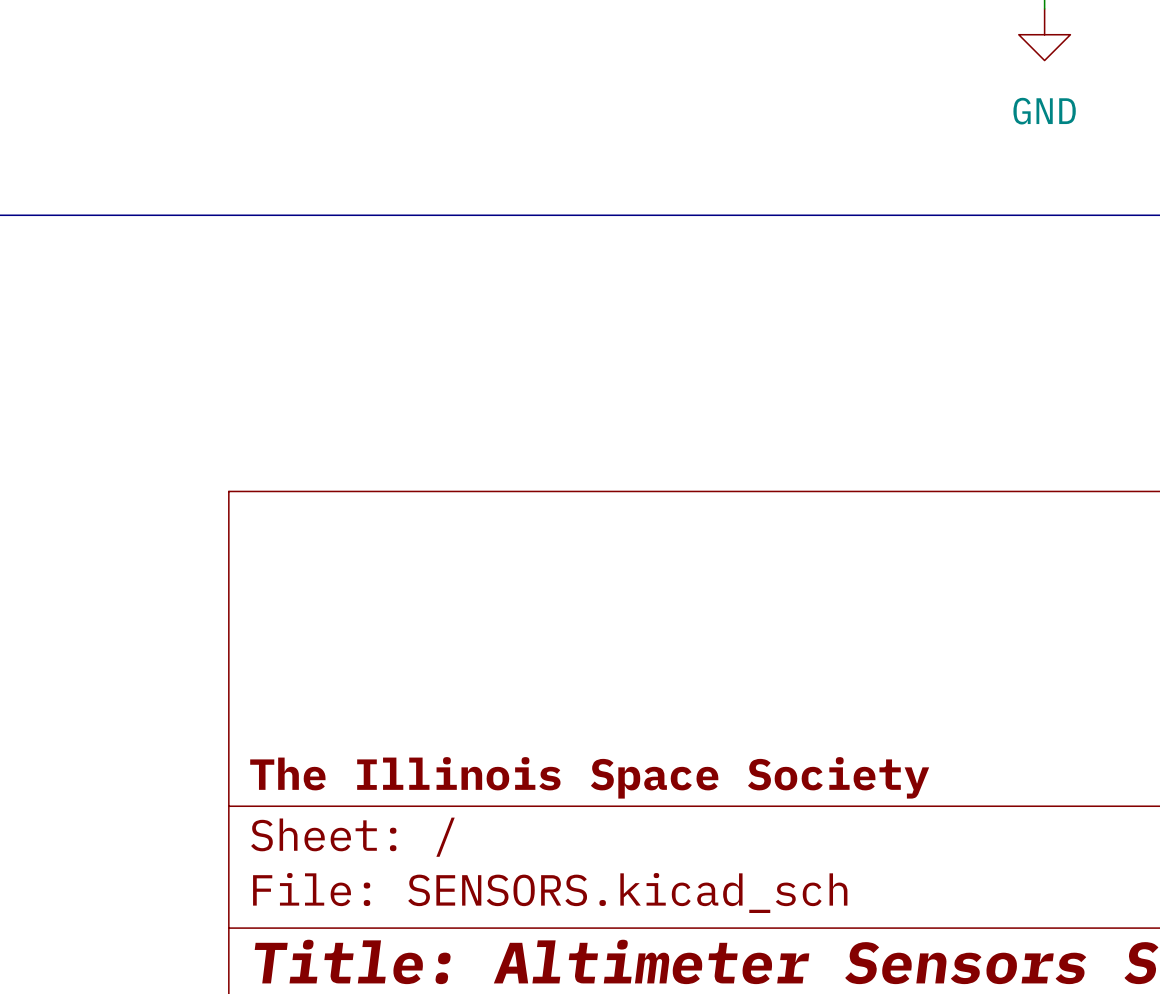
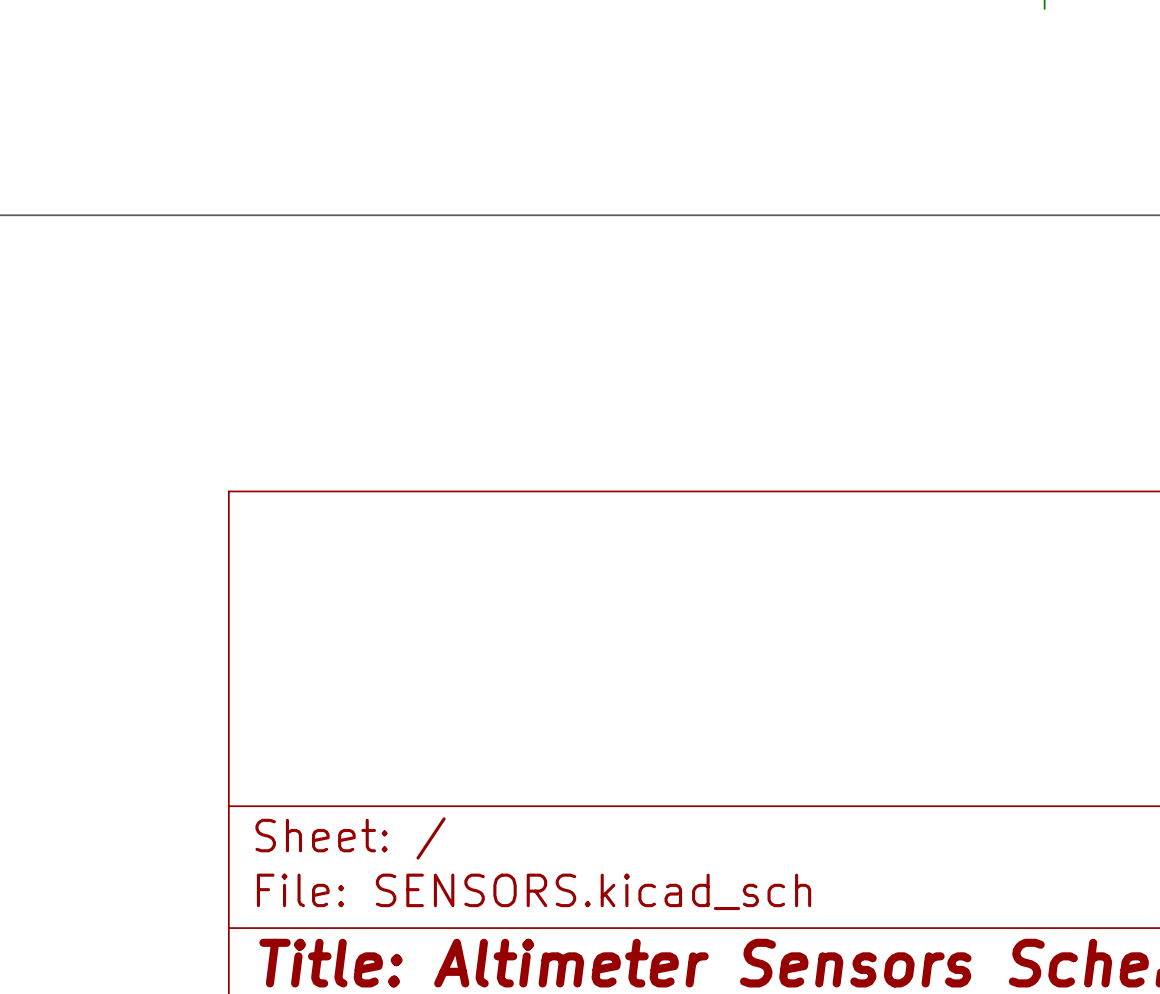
power symbol: GND (1044, 34) -> none
title block: The Illinois Space Society (589, 777) -> none

